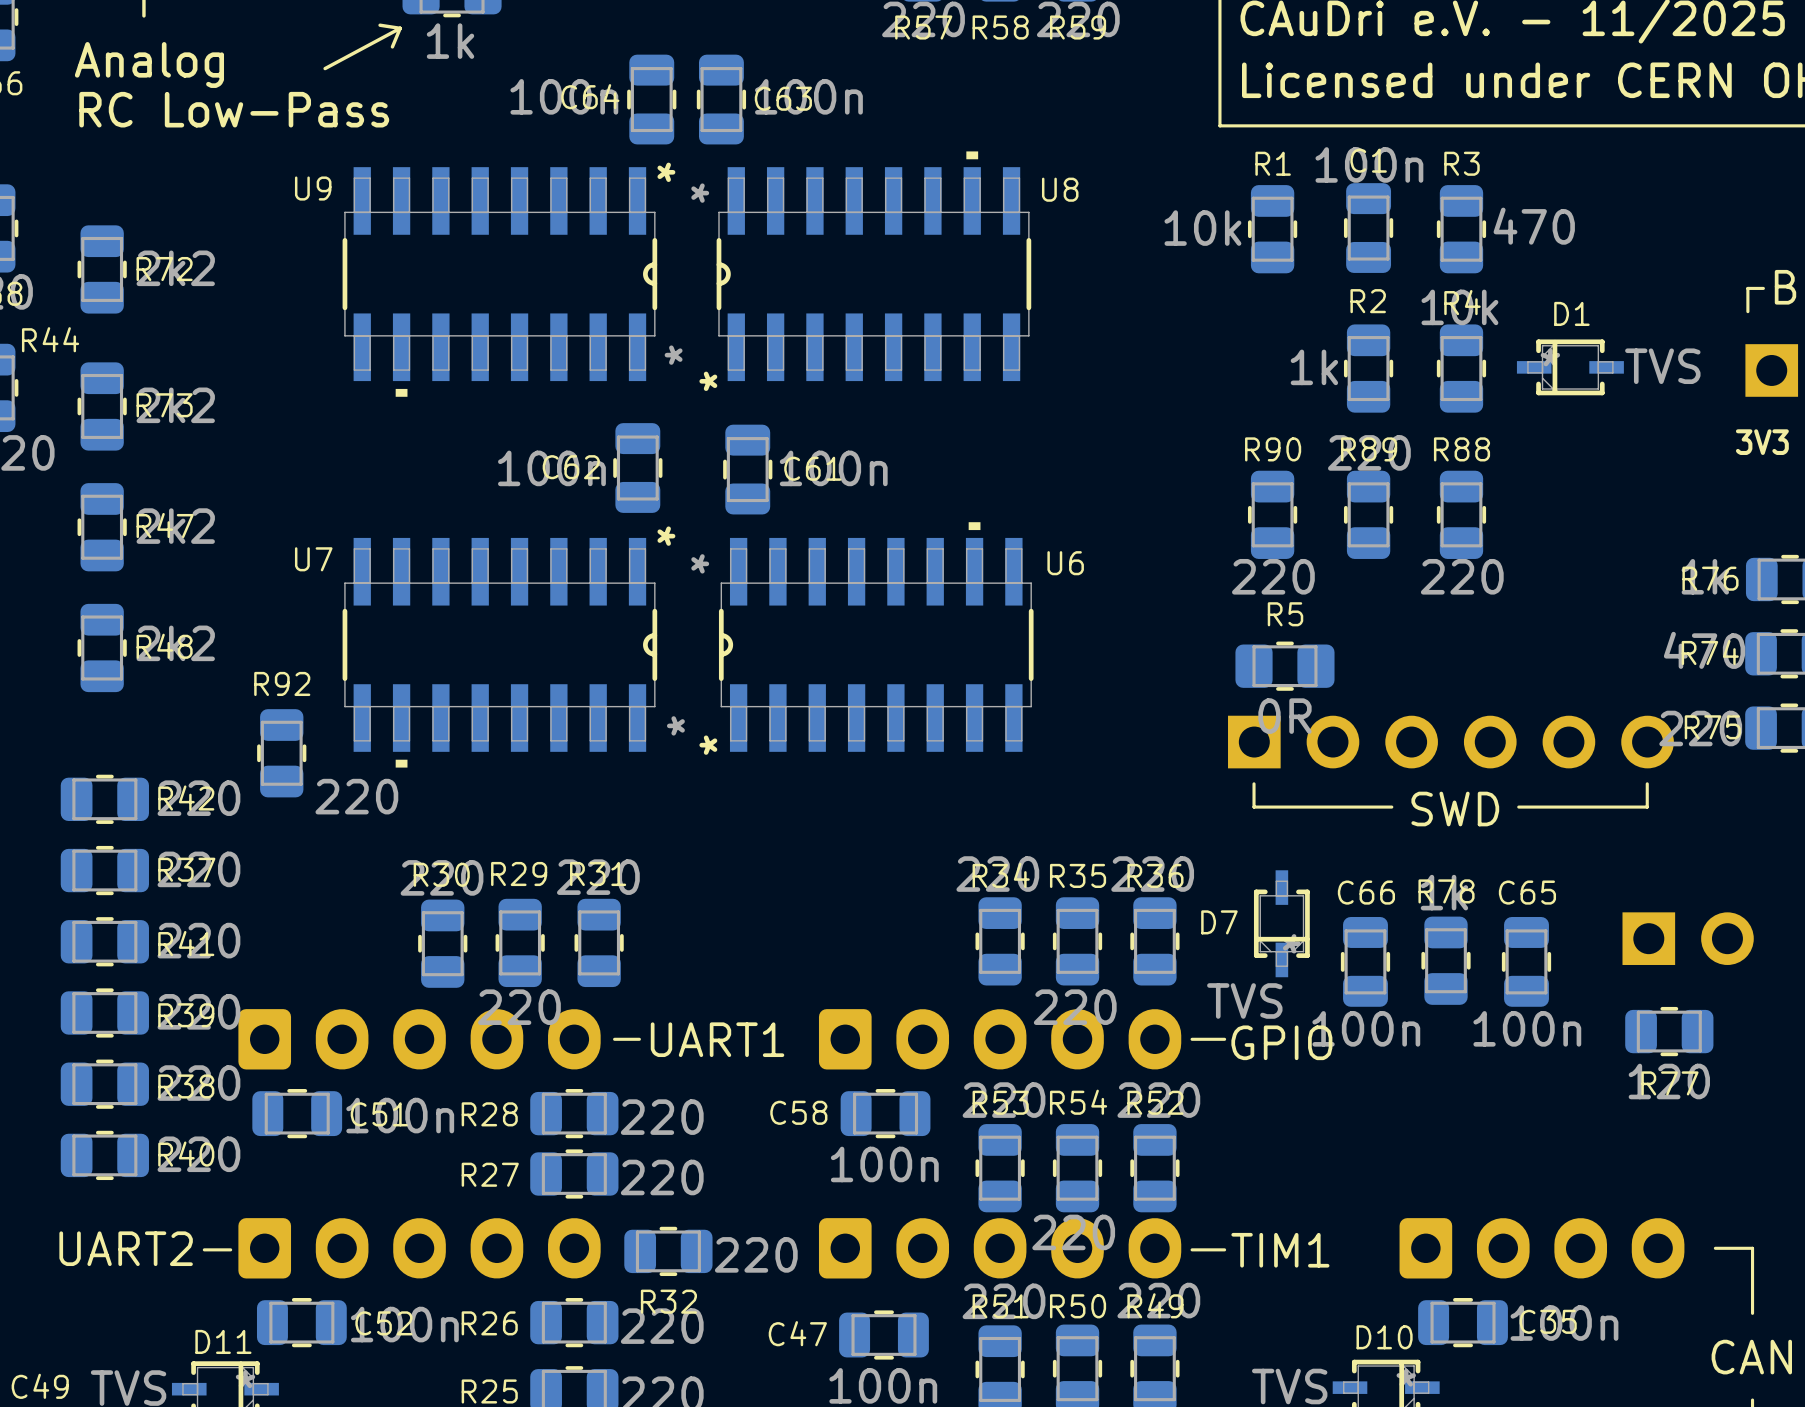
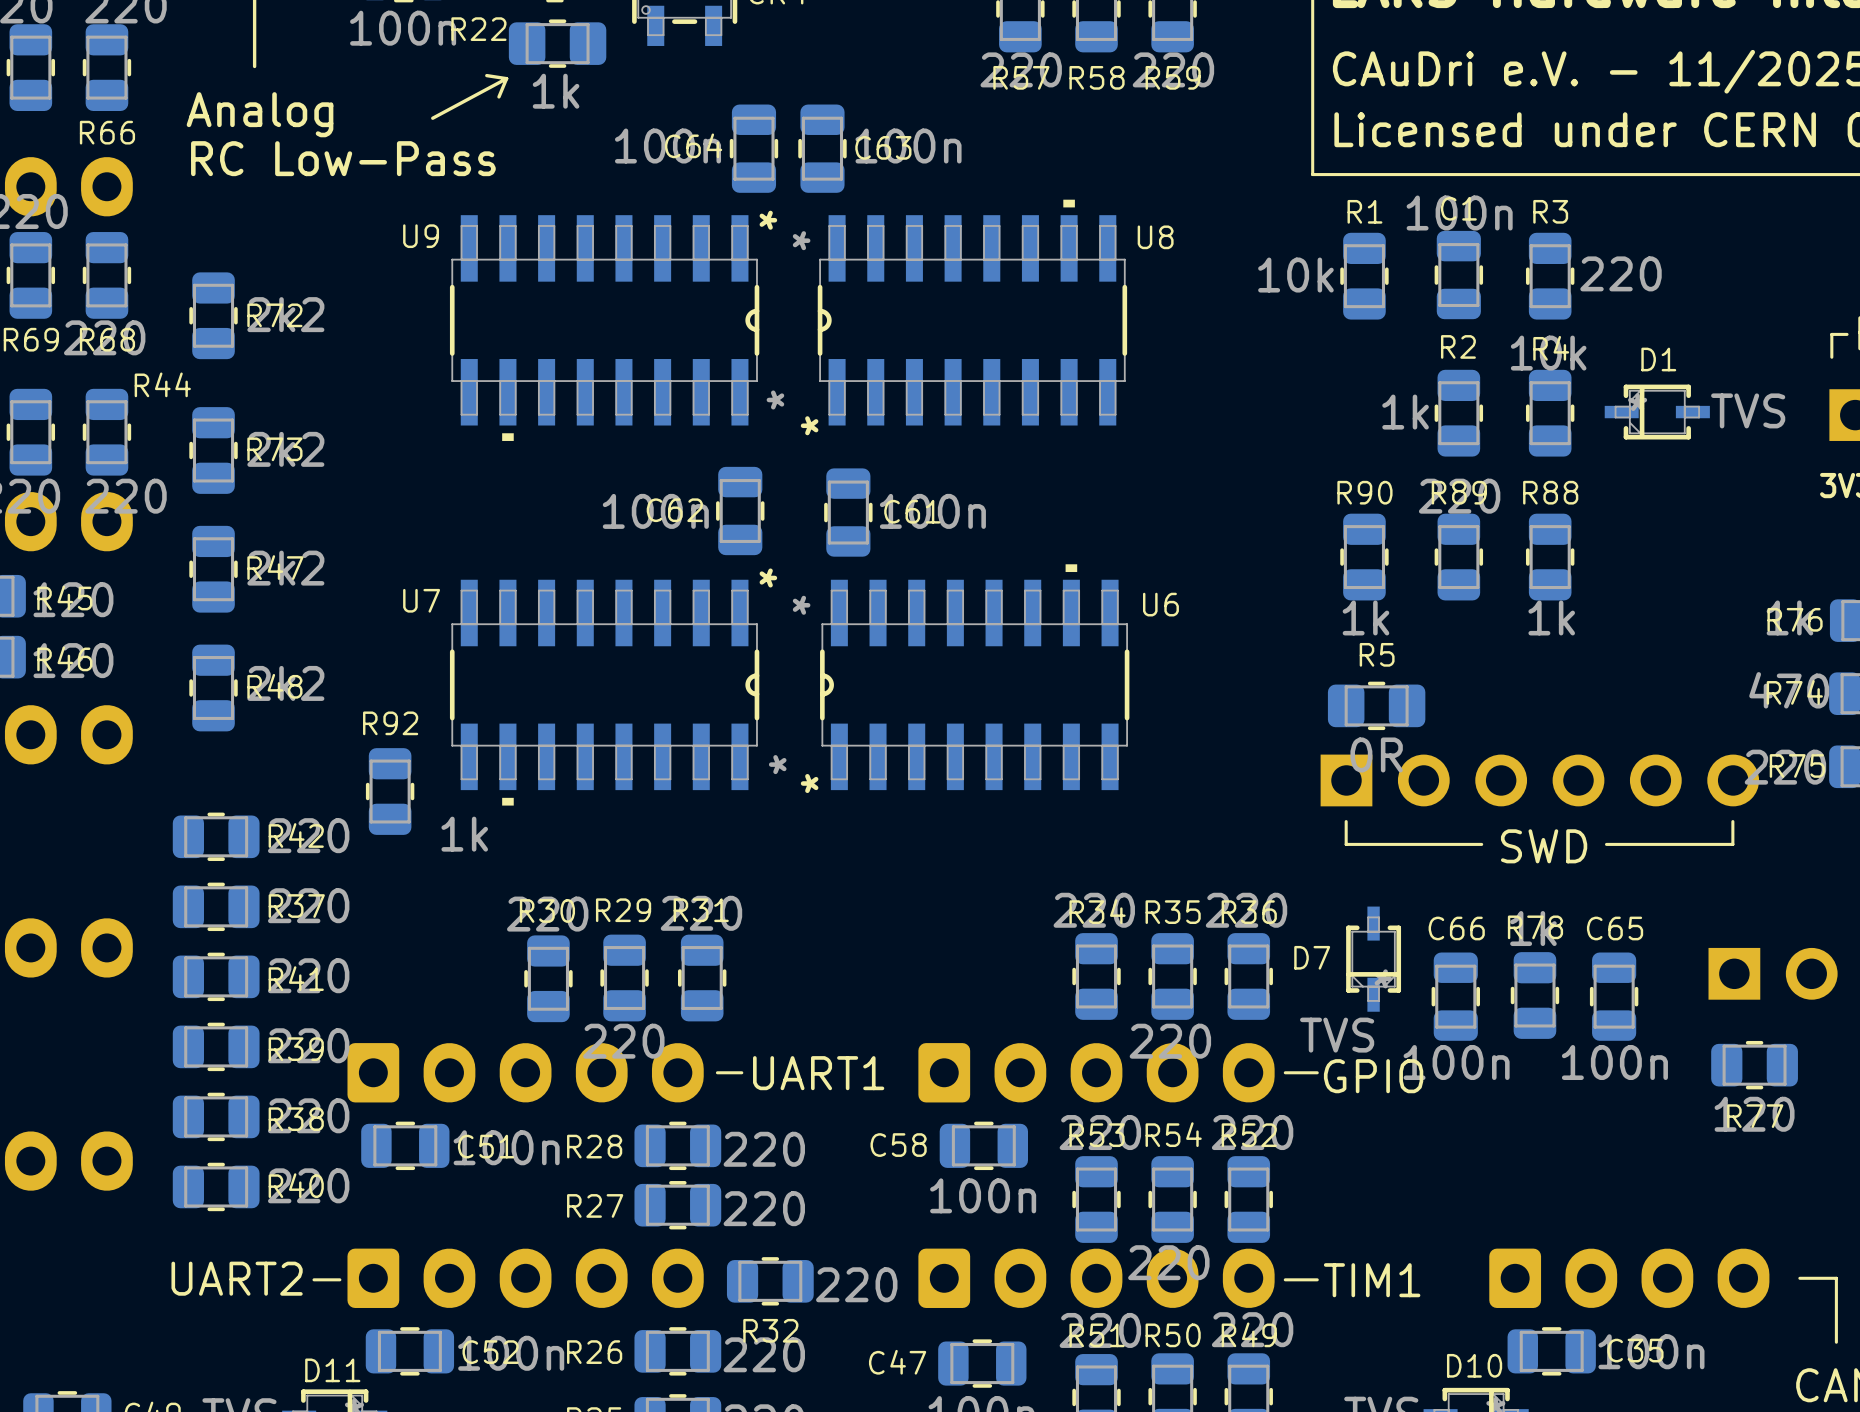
R3 value: 470 (1534, 226) -> 220 (1621, 273)
R90 value: 220 (1273, 576) -> 1k (1365, 617)
R88 value: 220 (1462, 576) -> 1k (1551, 617)
R92 value: 220 (356, 796) -> 1k (464, 834)

